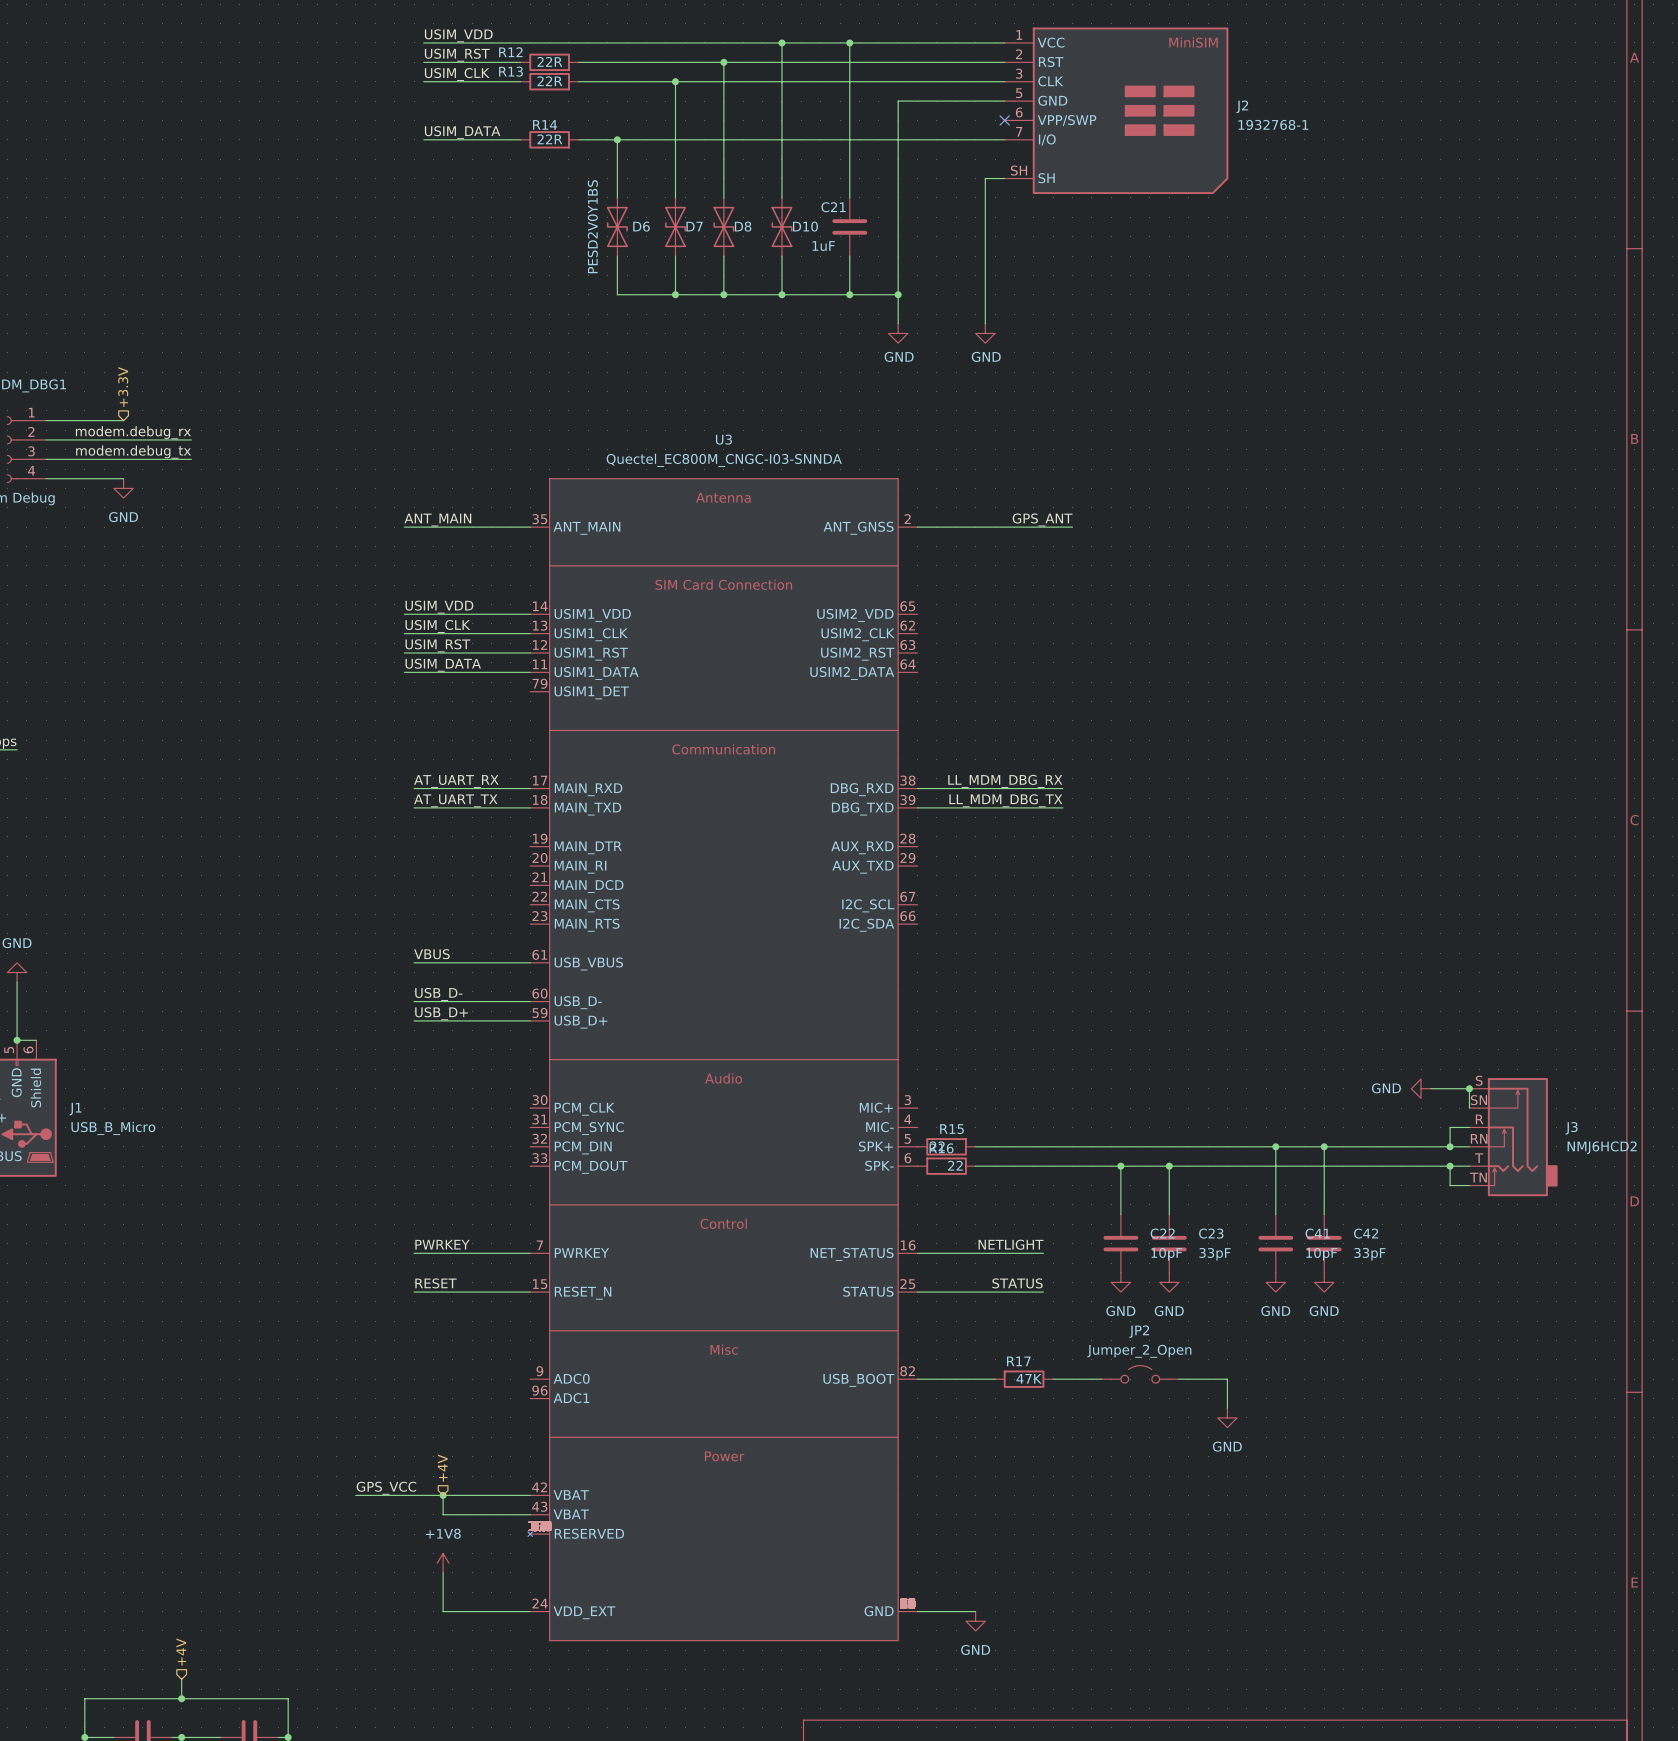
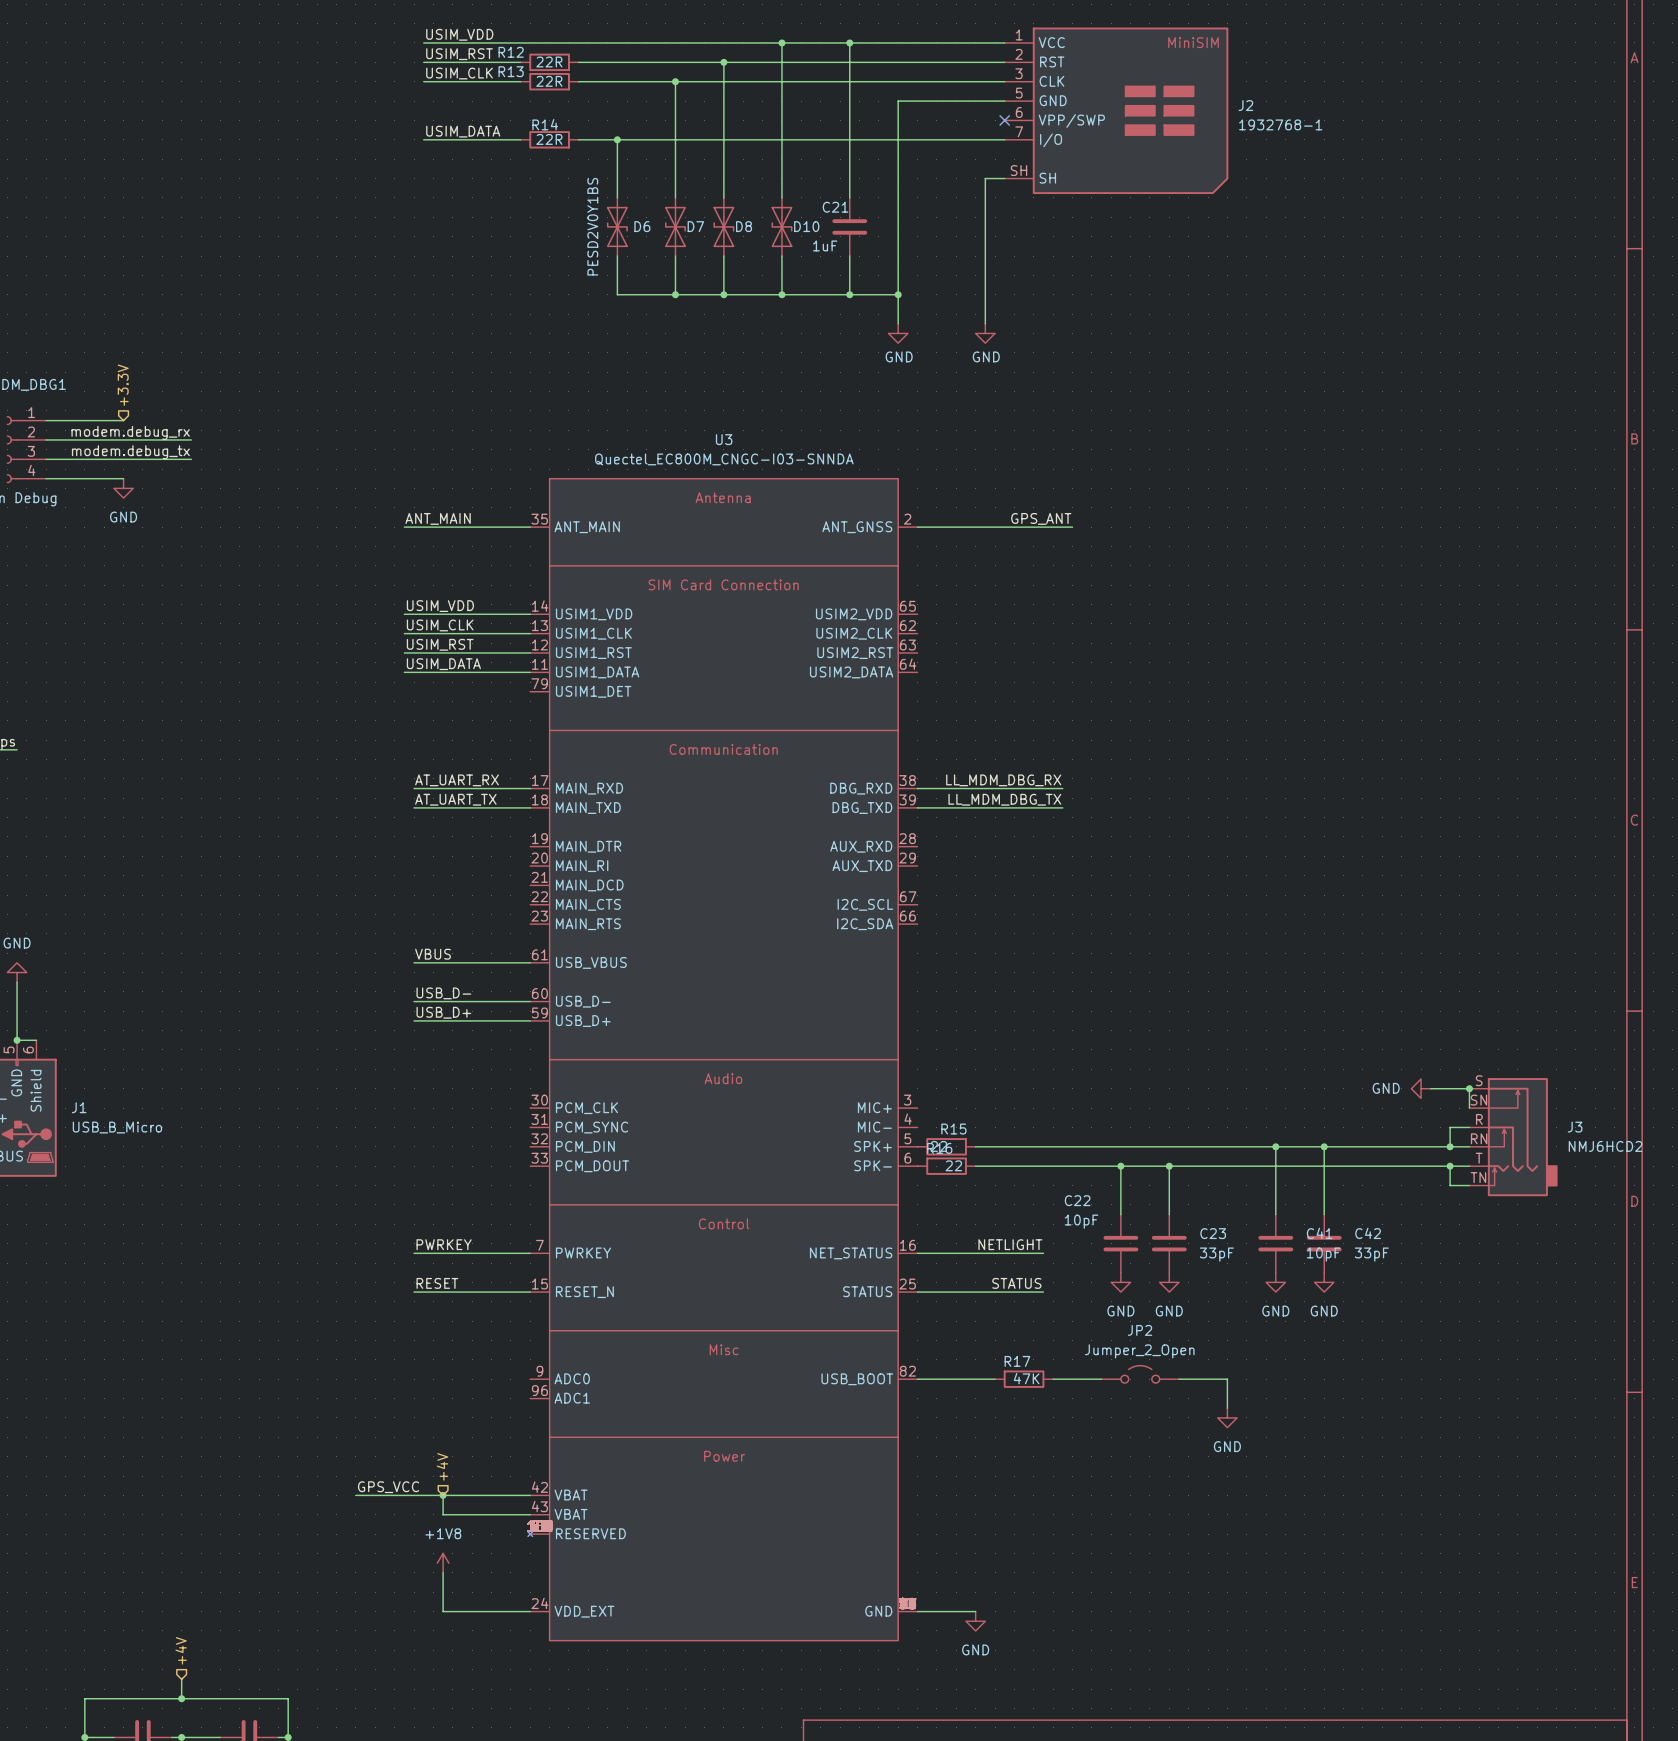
C22 name position: C22 (1162, 1233) -> C22 (1077, 1200)
C22 value position: 10pF (1166, 1254) -> 10pF (1081, 1221)

